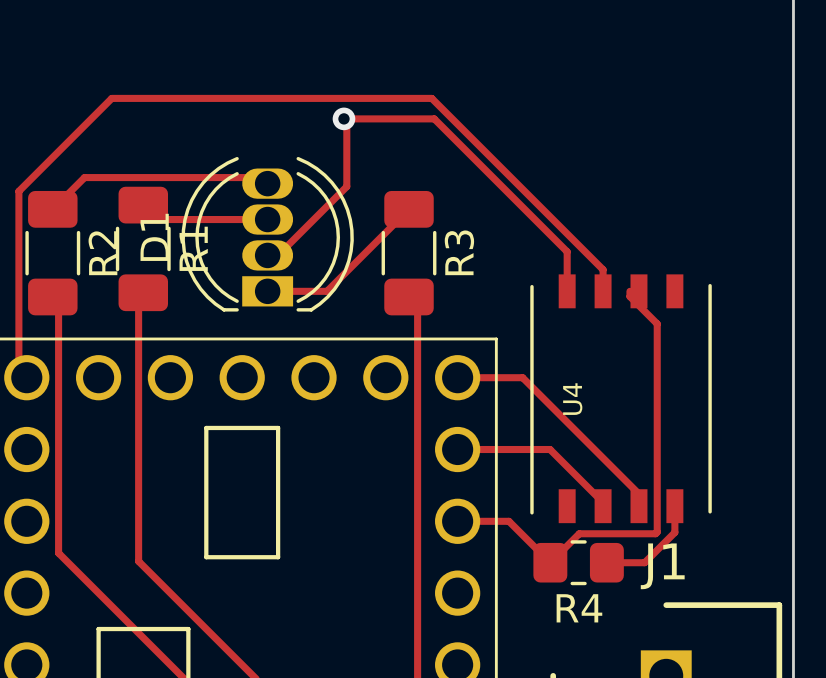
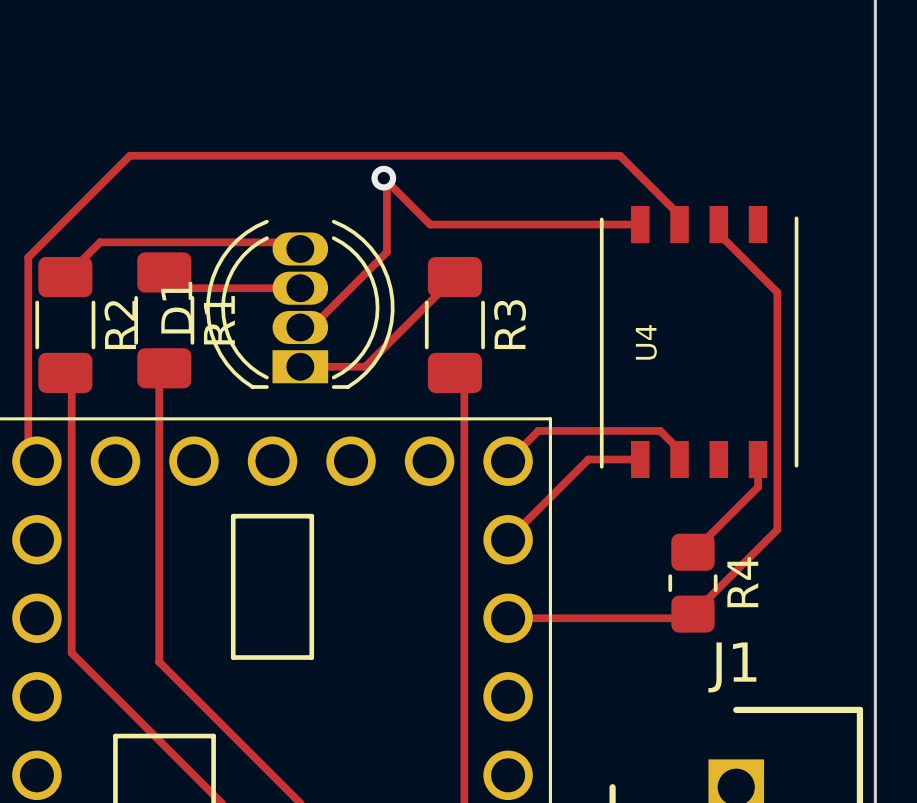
track: (431, 98) (603, 269) (603, 291) -> (479, 155) (620, 155) (679, 215) (679, 224)
track: (343, 118) (434, 118) (567, 251) (567, 291) -> (383, 178) (430, 224) (640, 224)
track: (629, 291) (629, 296) (657, 323) (657, 532) (655, 533) (579, 533) (550, 562) (508, 521) -> (718, 224) (718, 233) (777, 292) (777, 529) (688, 618) (564, 618)
track: none -> (758, 459) (758, 487) (692, 552)
track: (457, 377) (522, 377) (642, 497) (642, 506) -> (508, 461) (538, 430) (660, 430) (679, 450) (679, 459)
U4 position: (621, 398) -> (699, 342)
track: (457, 449) (550, 449) (606, 506) -> (508, 539) (588, 459) (640, 459)
track: (674, 506) (674, 532) (644, 562) (606, 562) -> none
R4 rotation: 0° (578, 562) -> 90° clockwise (692, 583)
R4 position: (578, 562) -> (692, 583)
R4 name position: R4 (579, 608) -> R4 (742, 582)

